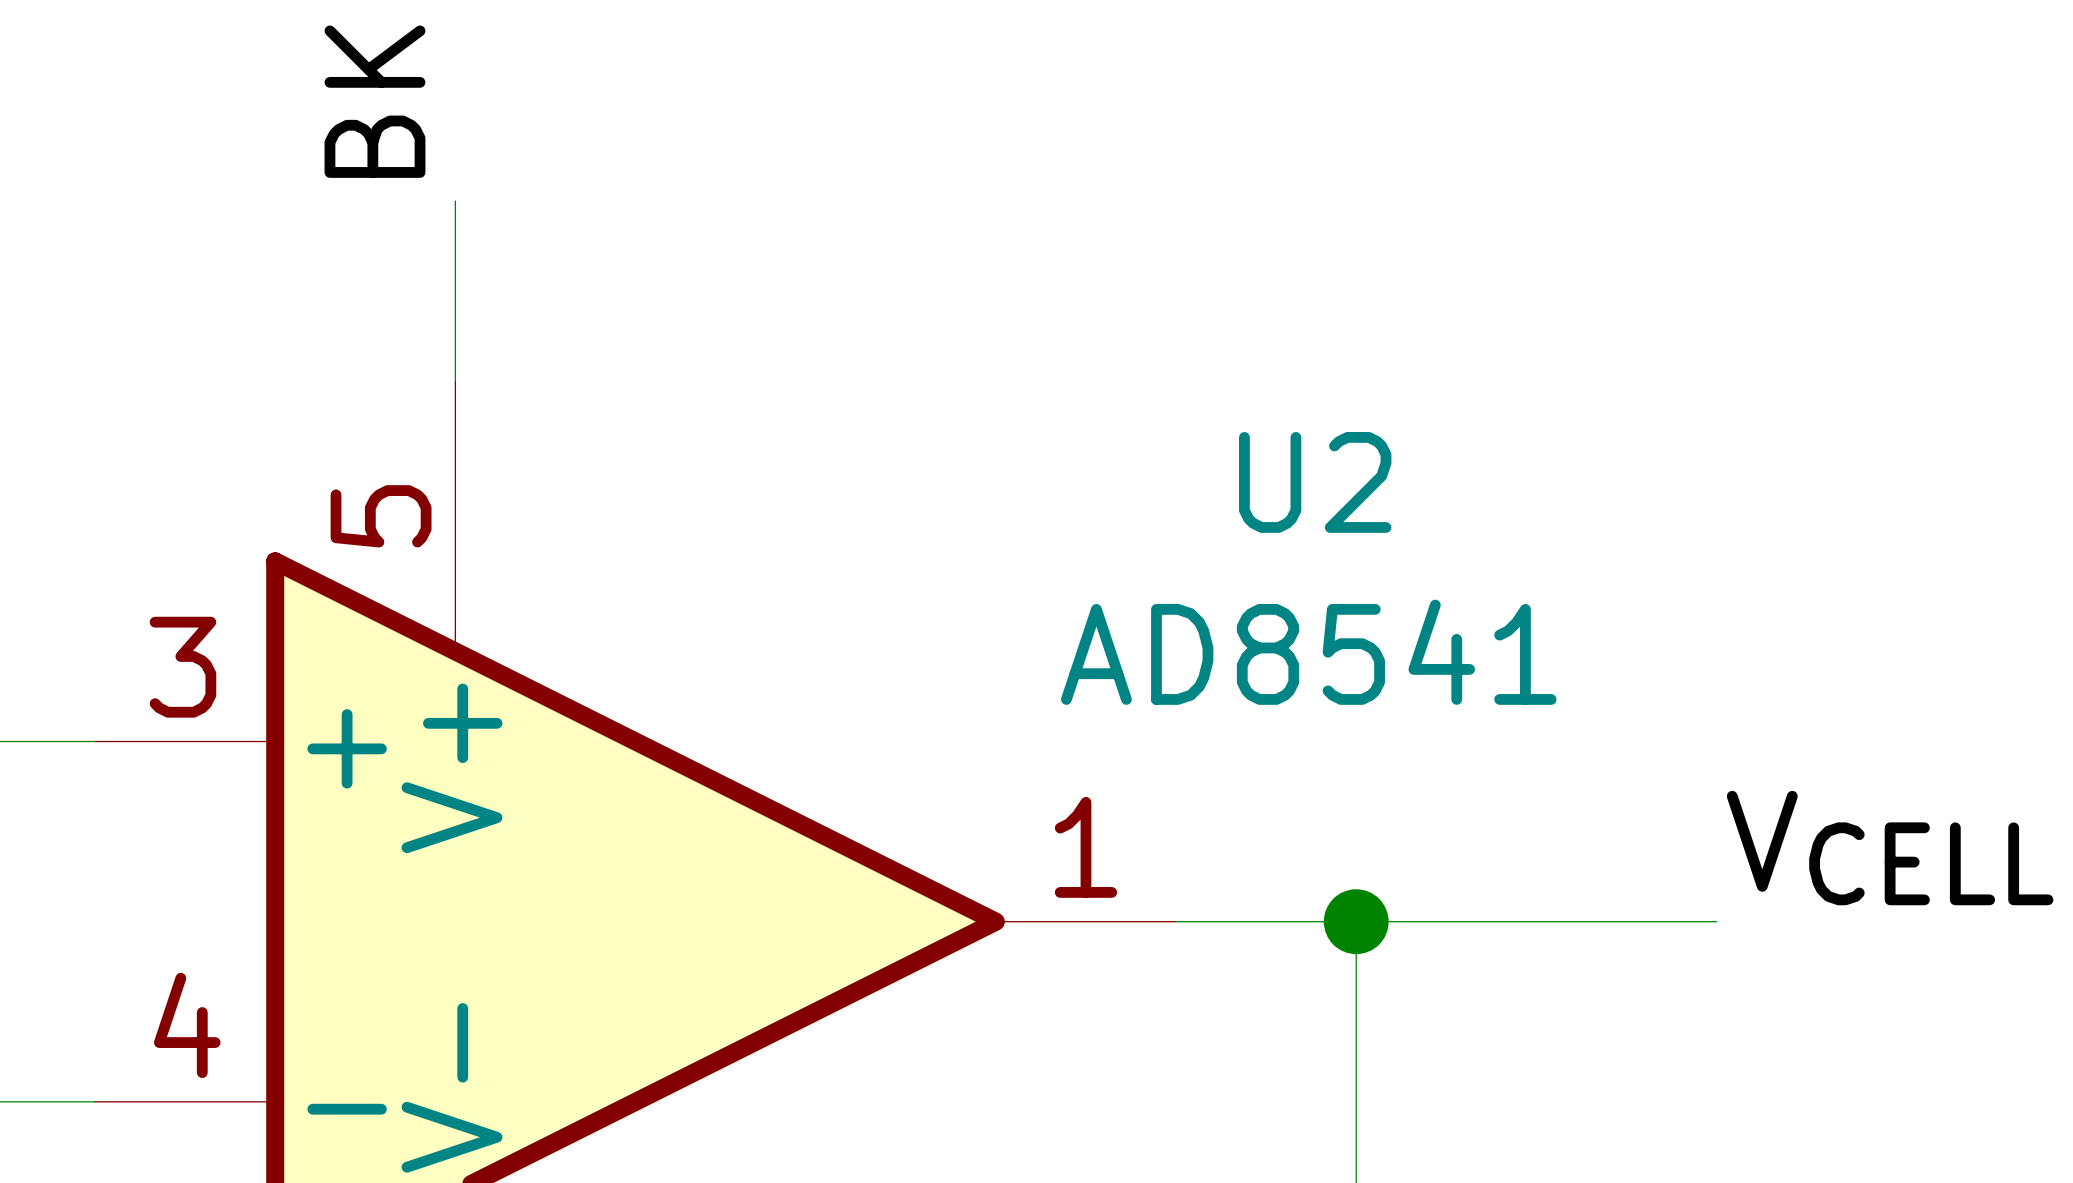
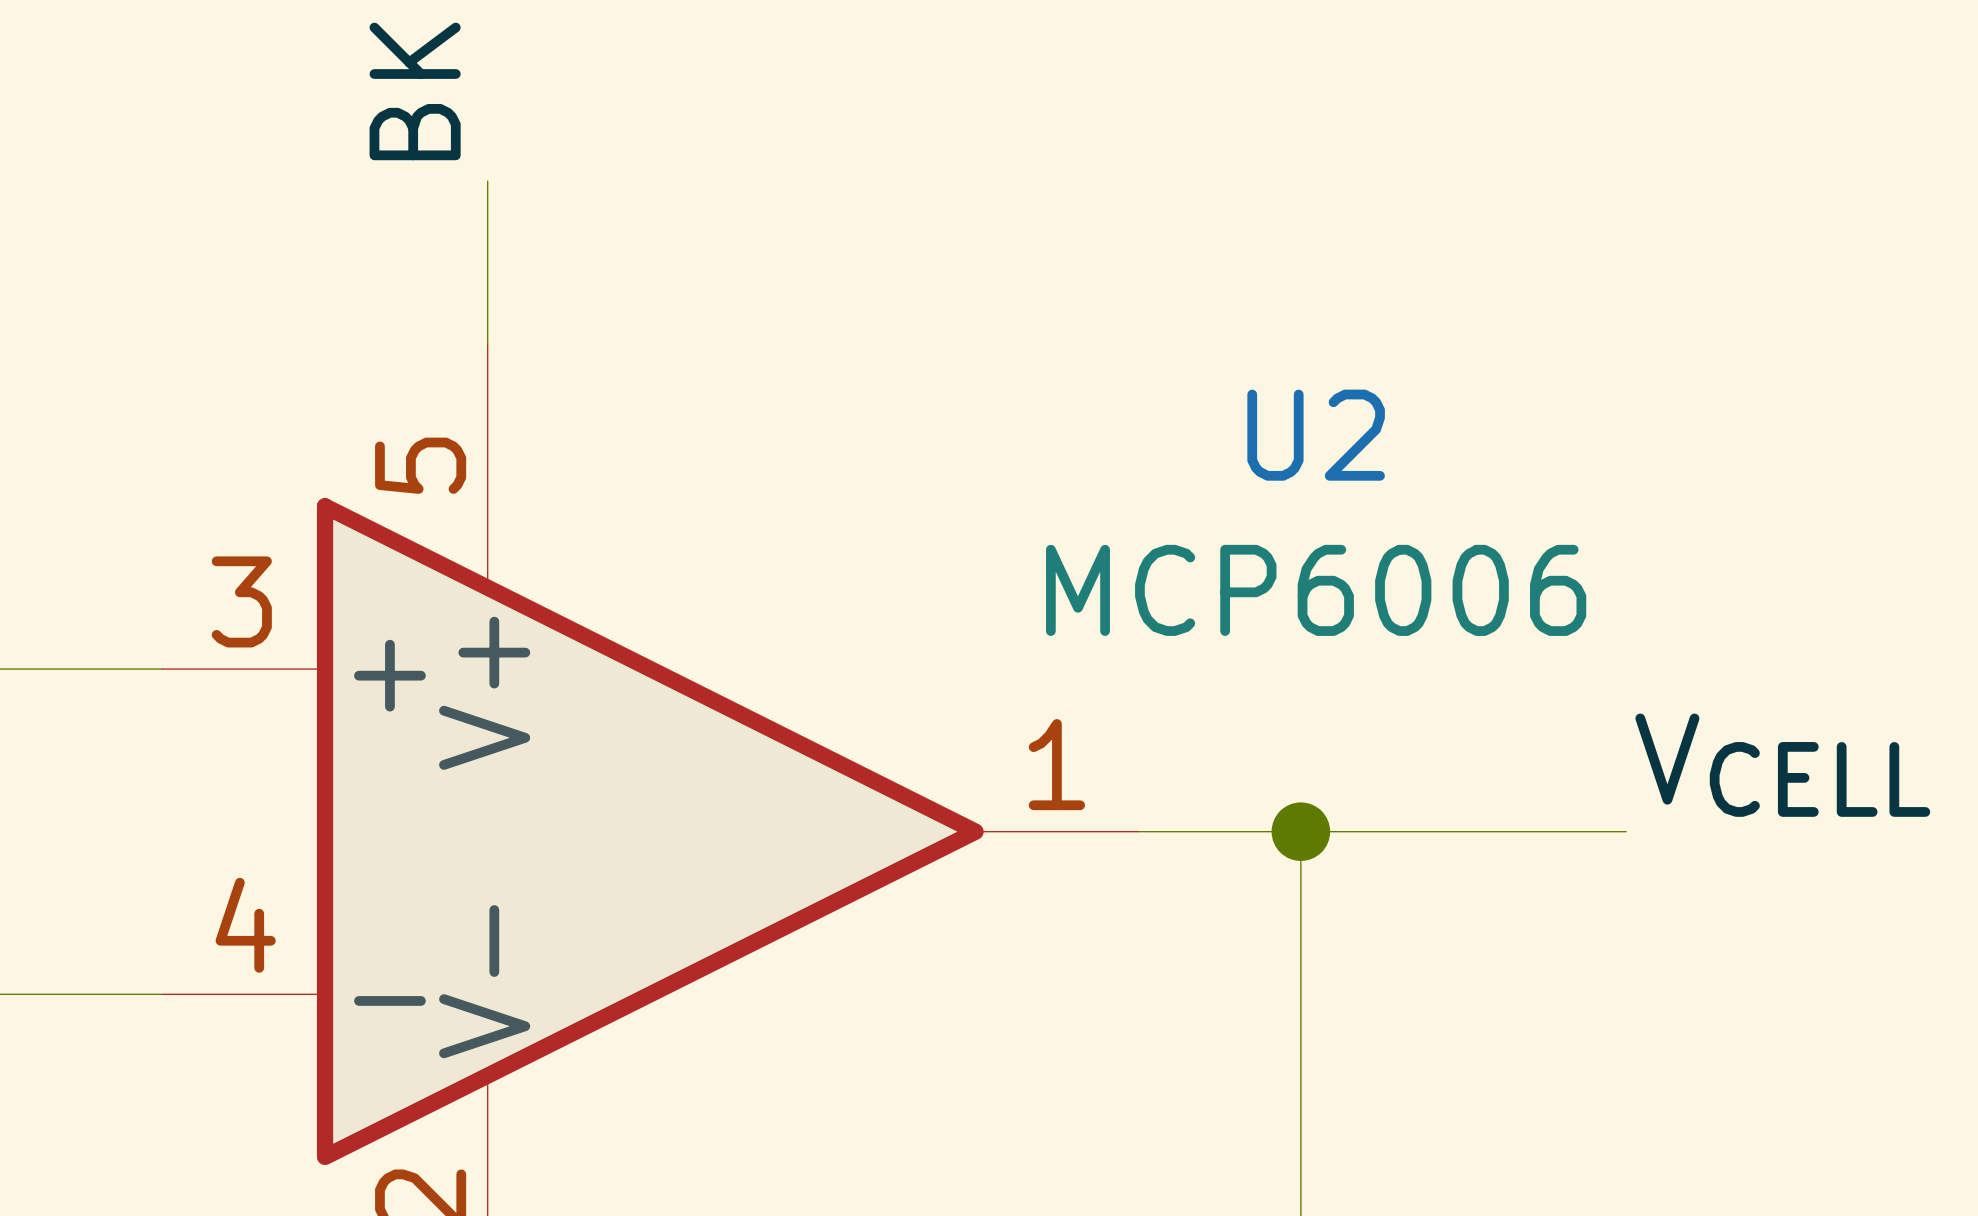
U2 name position: U2 (1315, 482) -> U2 (1316, 435)
U2 value: AD8541 (1308, 652) -> MCP6006 (1316, 590)

